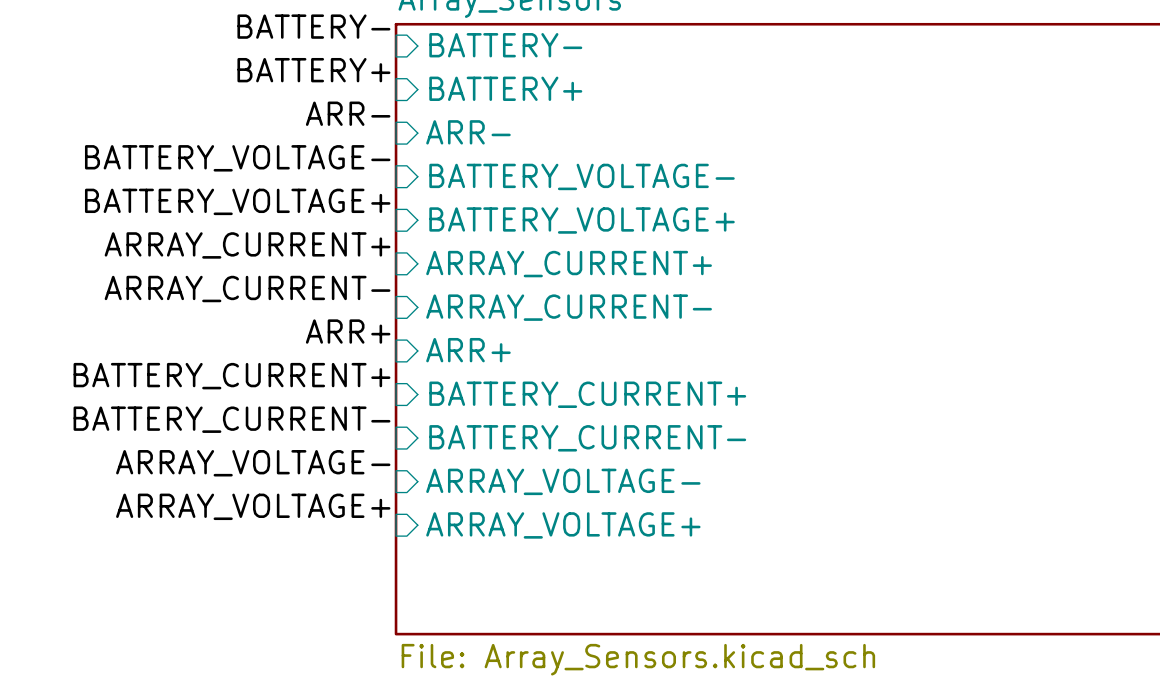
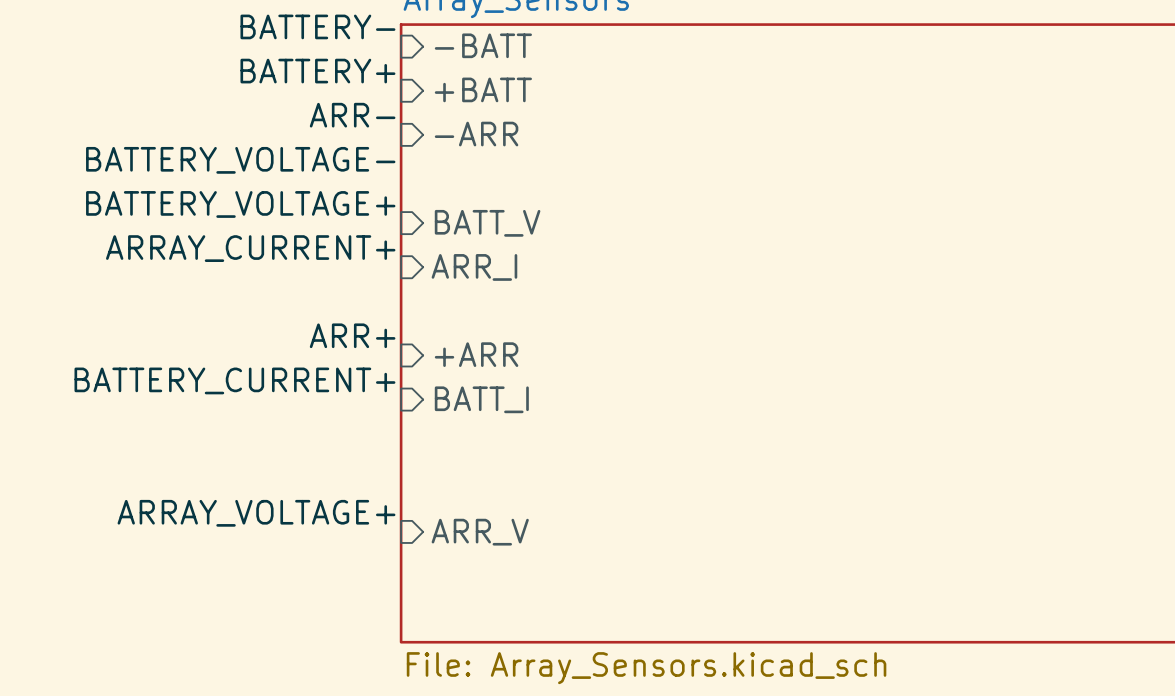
sheet pin: BATTERY- (505, 45) -> -BATT (483, 45)
sheet pin: BATTERY+ (505, 88) -> +BATT (483, 89)
sheet pin: ARR- (468, 132) -> -ARR (476, 134)
sheet pin: BATTERY_VOLTAGE- (582, 176) -> none
sheet pin: BATTERY_VOLTAGE+ (582, 220) -> BATT_V (487, 223)
sheet pin: ARRAY_CURRENT+ (569, 264) -> ARR_I (474, 267)
label: ARRAY_CURRENT- (247, 289) -> none
sheet pin: ARRAY_CURRENT- (569, 307) -> none
sheet pin: ARR+ (468, 350) -> +ARR (476, 354)
sheet pin: BATTERY_CURRENT+ (587, 394) -> BATT_I (481, 399)
label: BATTERY_CURRENT- (231, 419) -> none
sheet pin: BATTERY_CURRENT- (587, 438) -> none
label: ARRAY_VOLTAGE- (253, 463) -> none
sheet pin: ARRAY_VOLTAGE- (563, 481) -> none
sheet pin: ARRAY_VOLTAGE+ (563, 525) -> ARR_V (480, 532)

